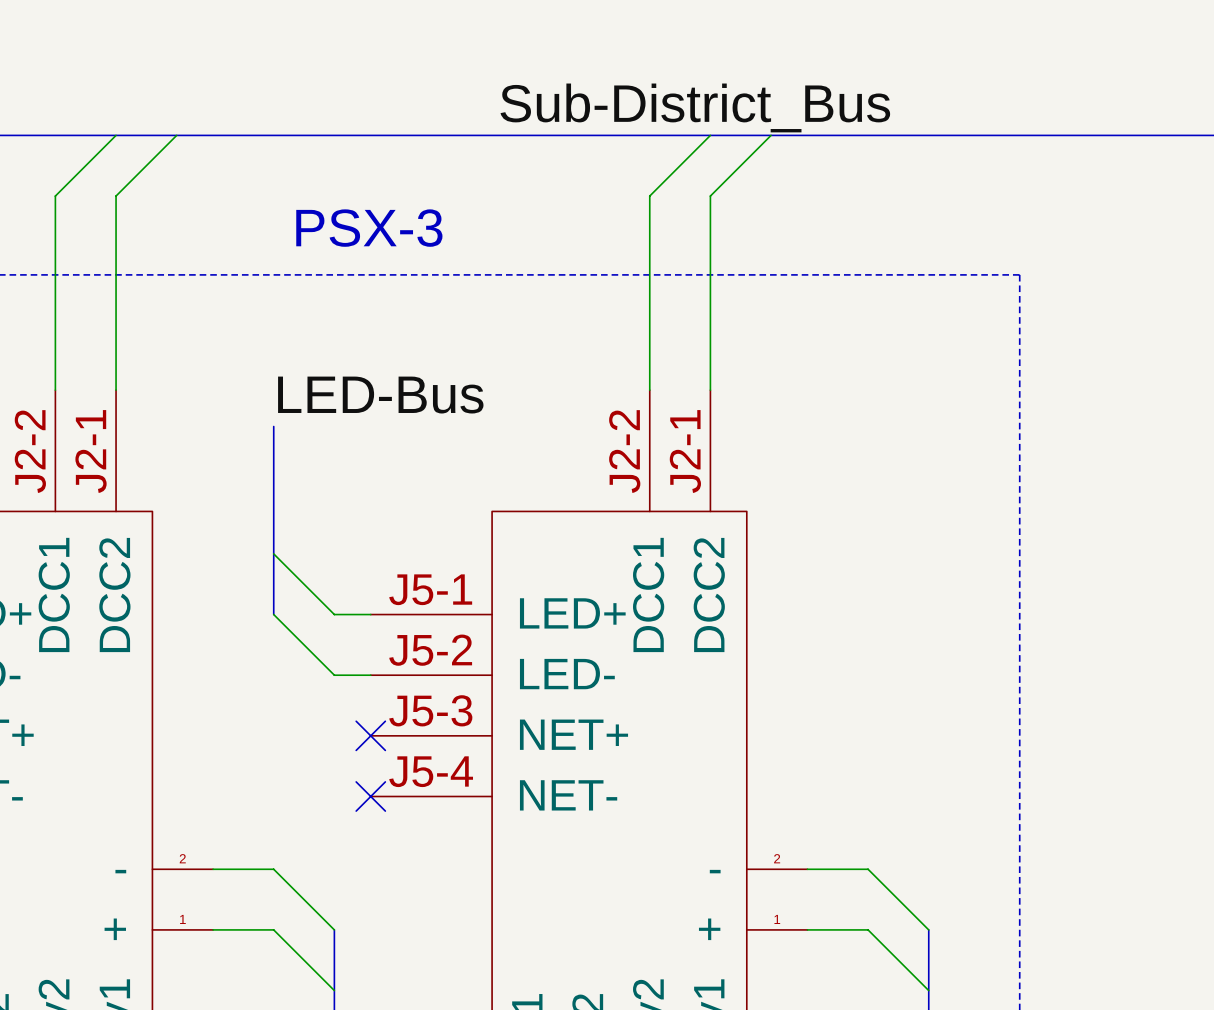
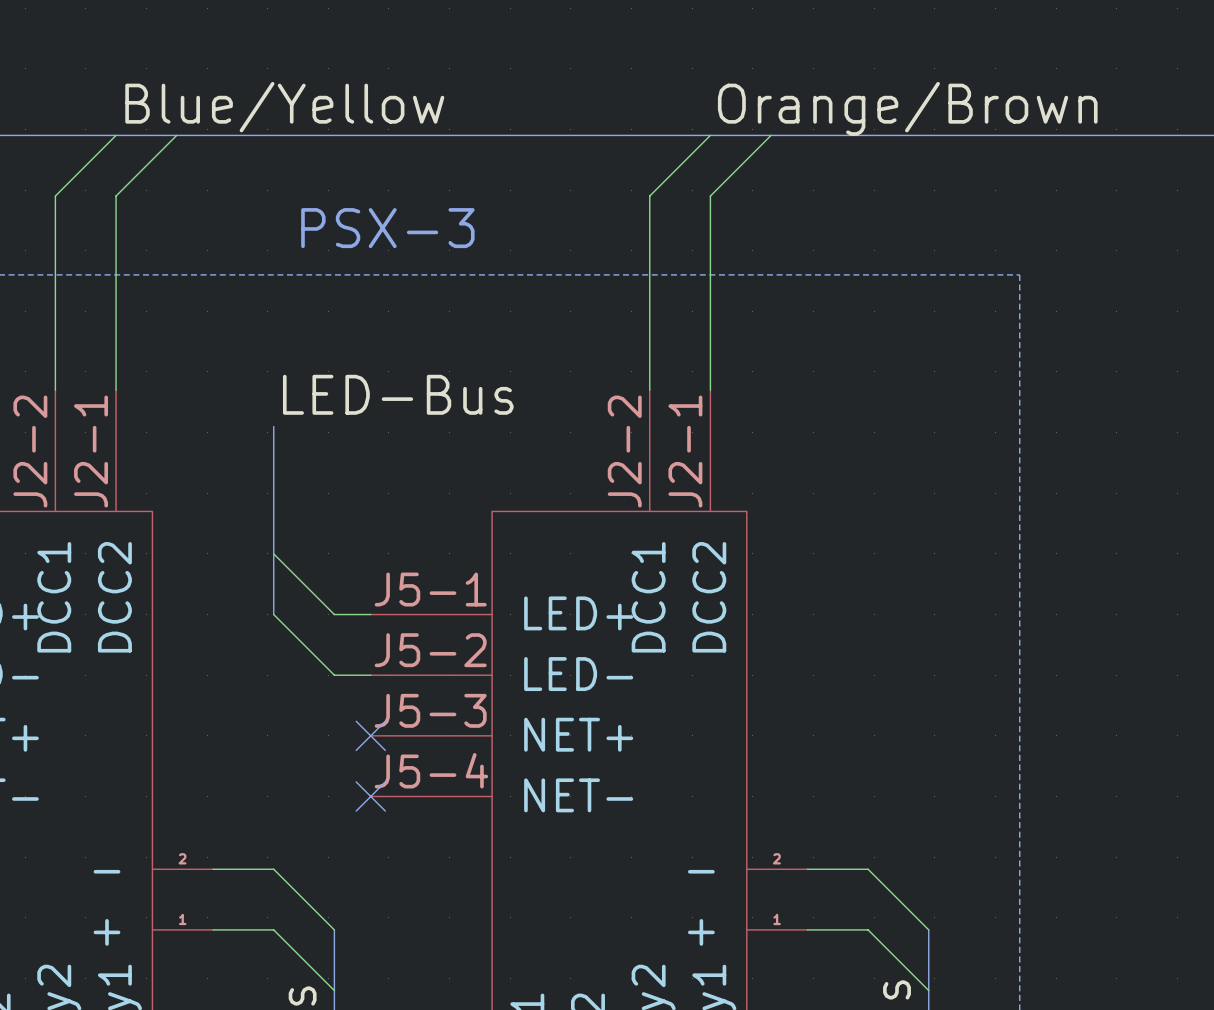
label: none -> Blue/Yellow (284, 107)
label: Sub-District_Bus (695, 107) -> none
label: none -> Orange/Brown (907, 108)

